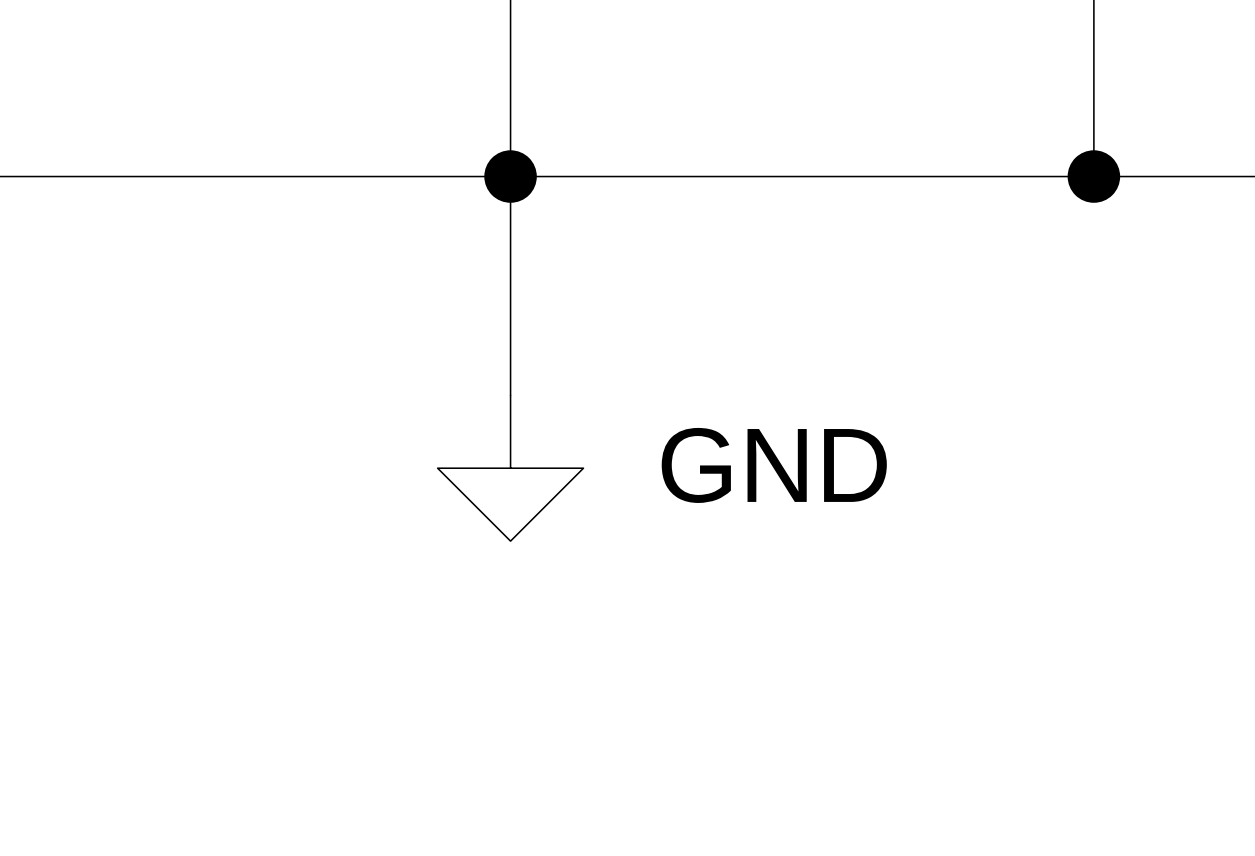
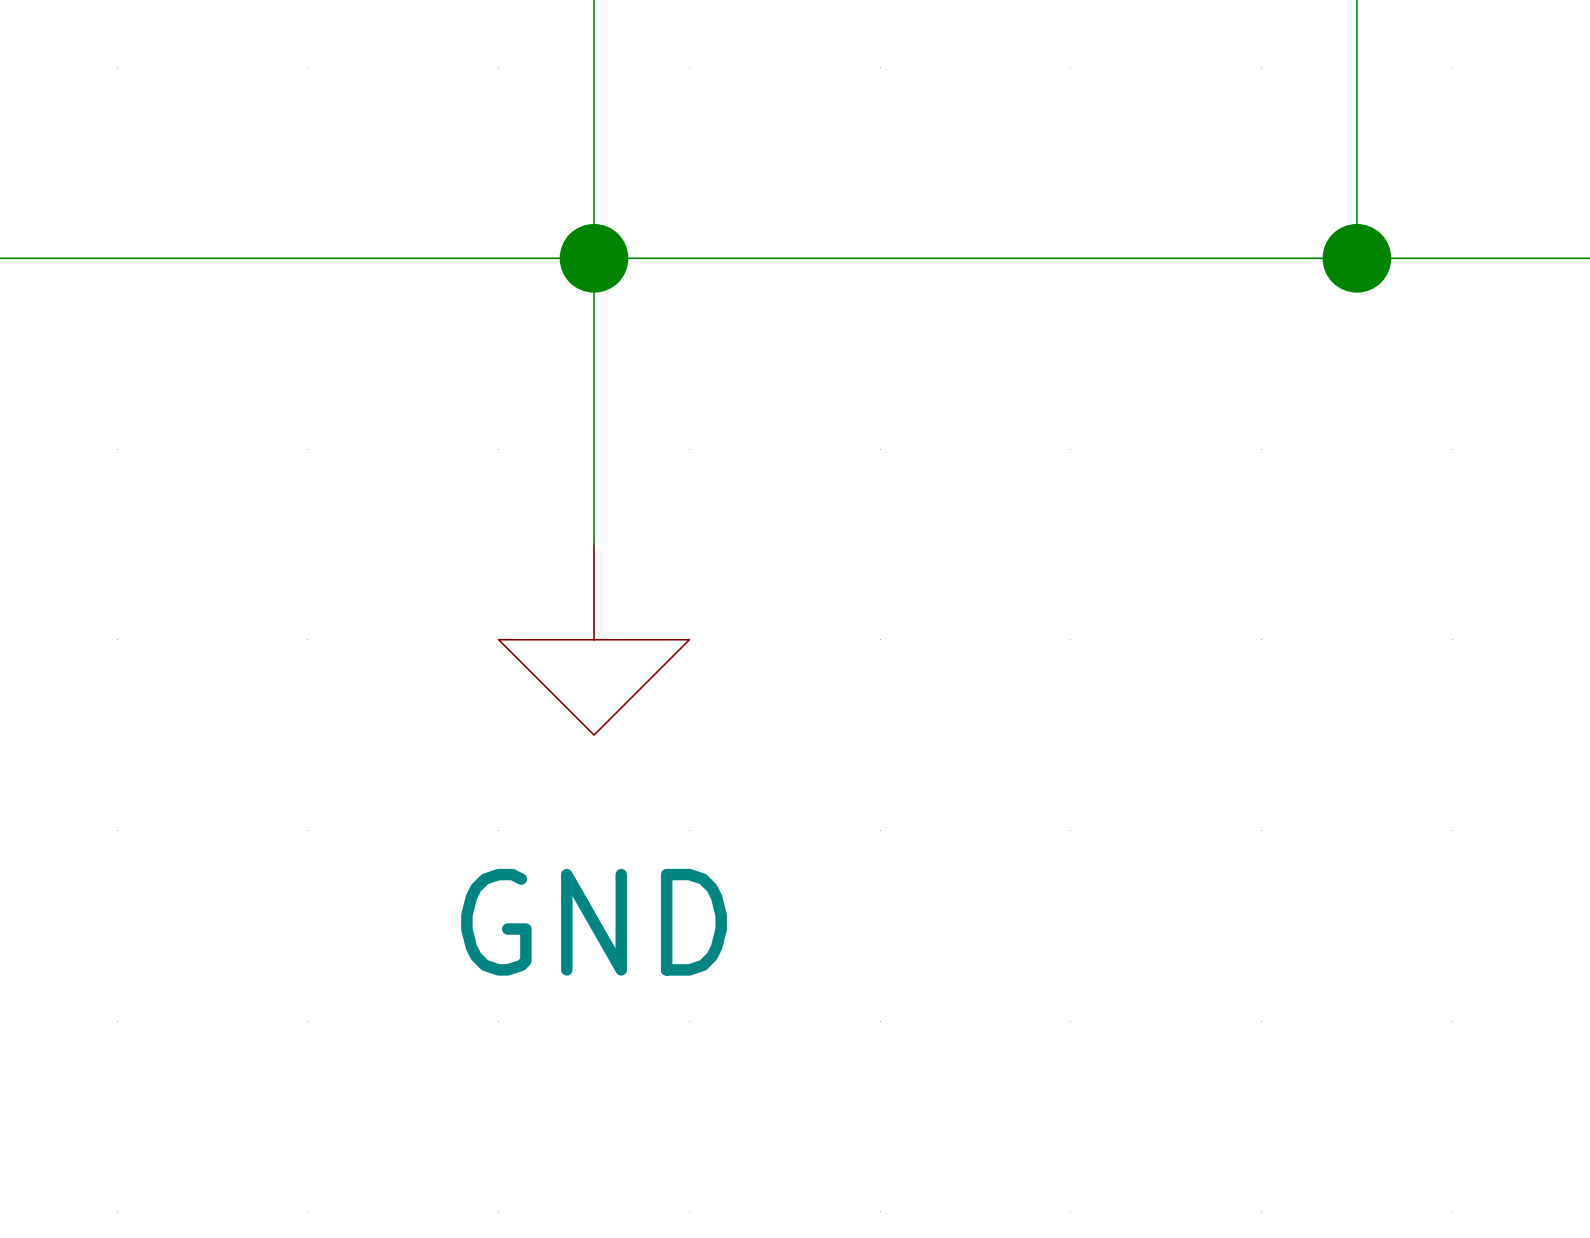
power symbol text position: GND (774, 465) -> GND (594, 922)

